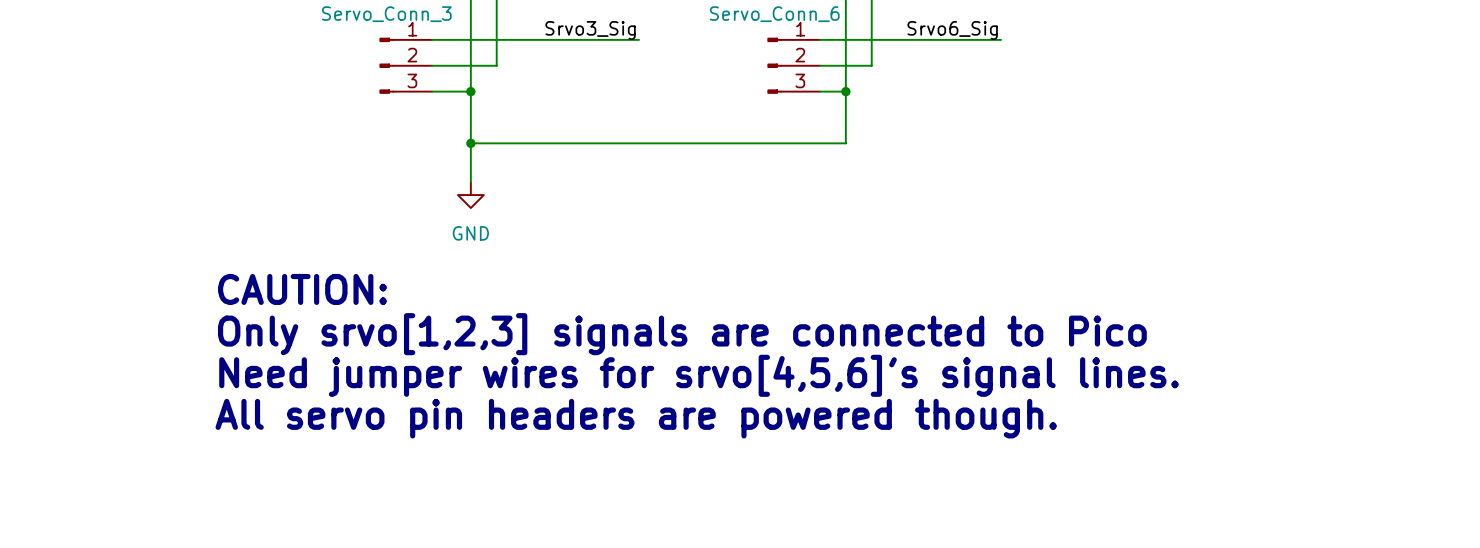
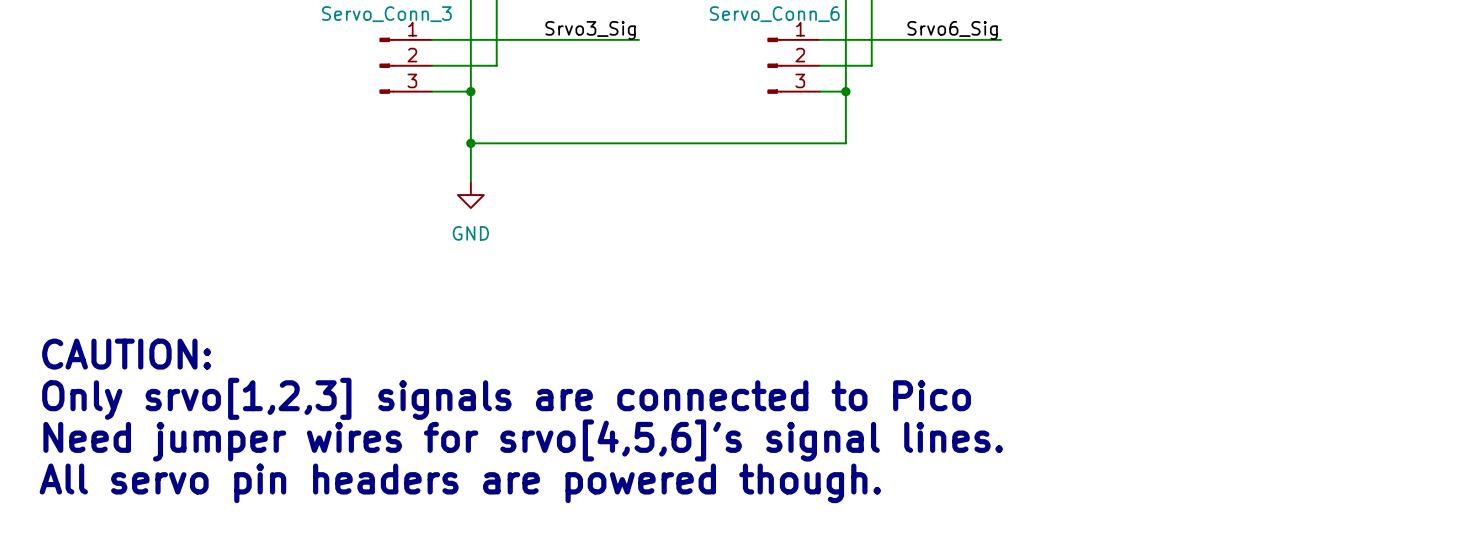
text position: CAUTION: (302, 289) -> CAUTION: (126, 354)
text position: Only srvo[1,2,3] signals are connected to Pico (682, 334) -> Only srvo[1,2,3] signals are connected to Pico (506, 398)
text position: Need jumper wires for srvo[4,5,6]'s signal lines. (699, 375) -> Need jumper wires for srvo[4,5,6]'s signal lines. (523, 440)
text position: All servo pin headers are powered though. (636, 418) -> All servo pin headers are powered though. (460, 483)

